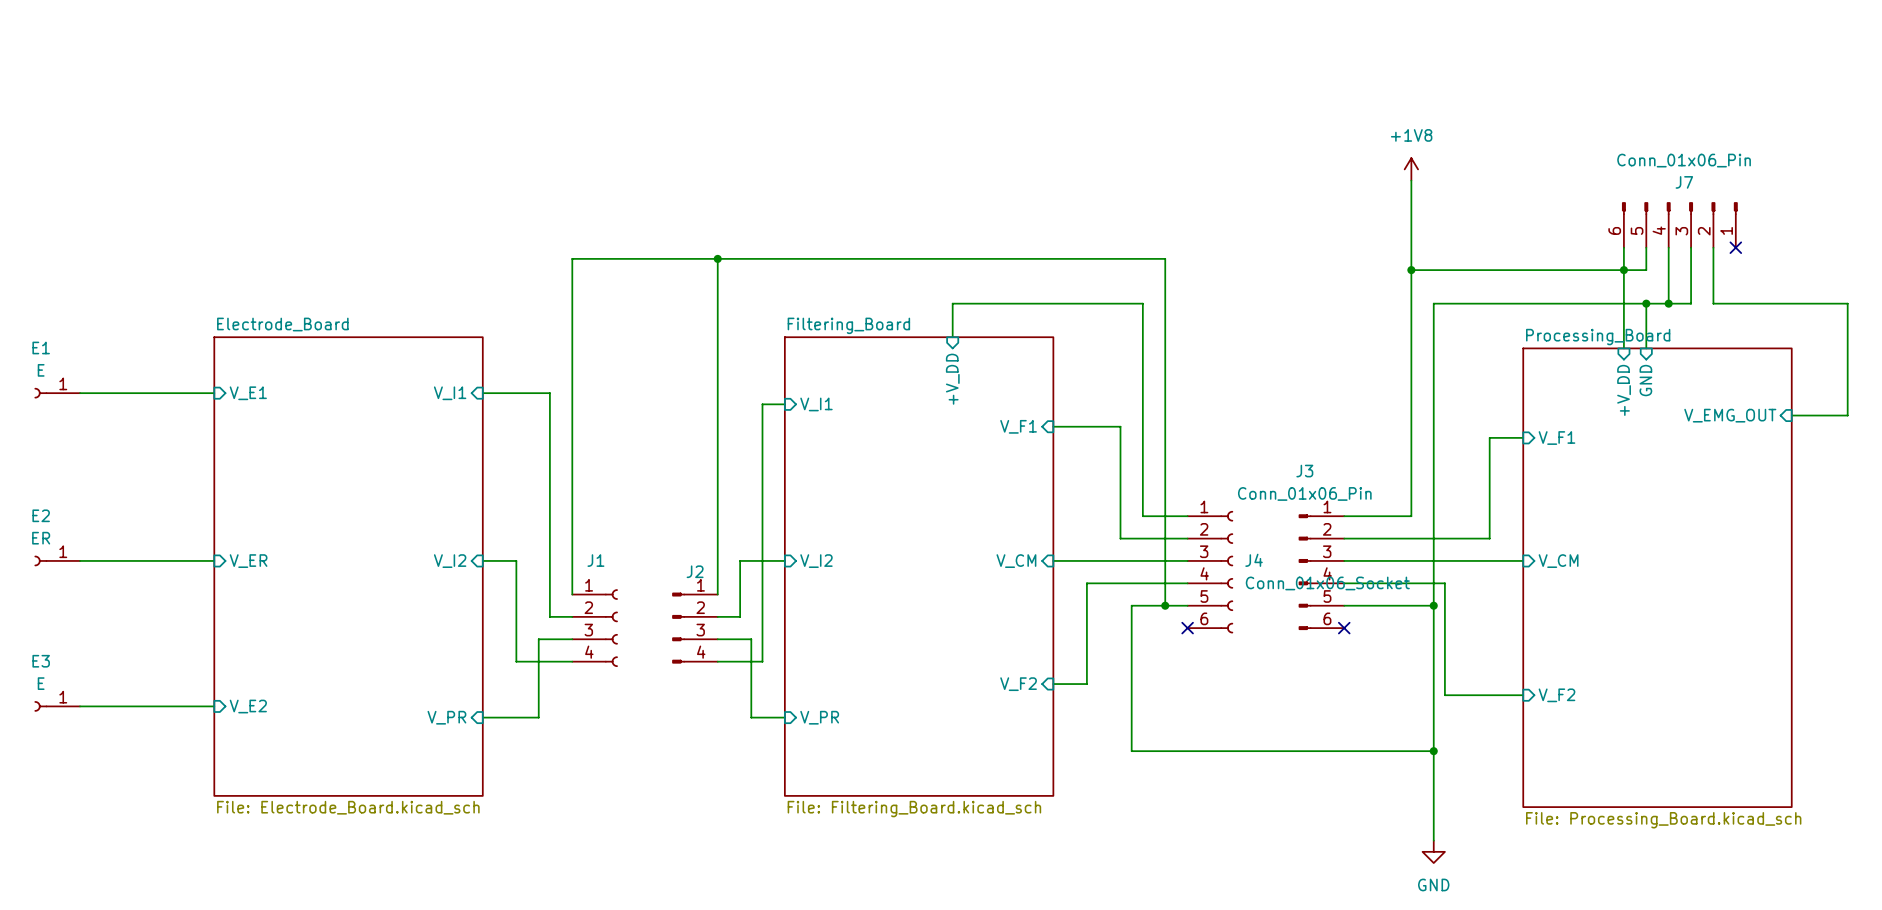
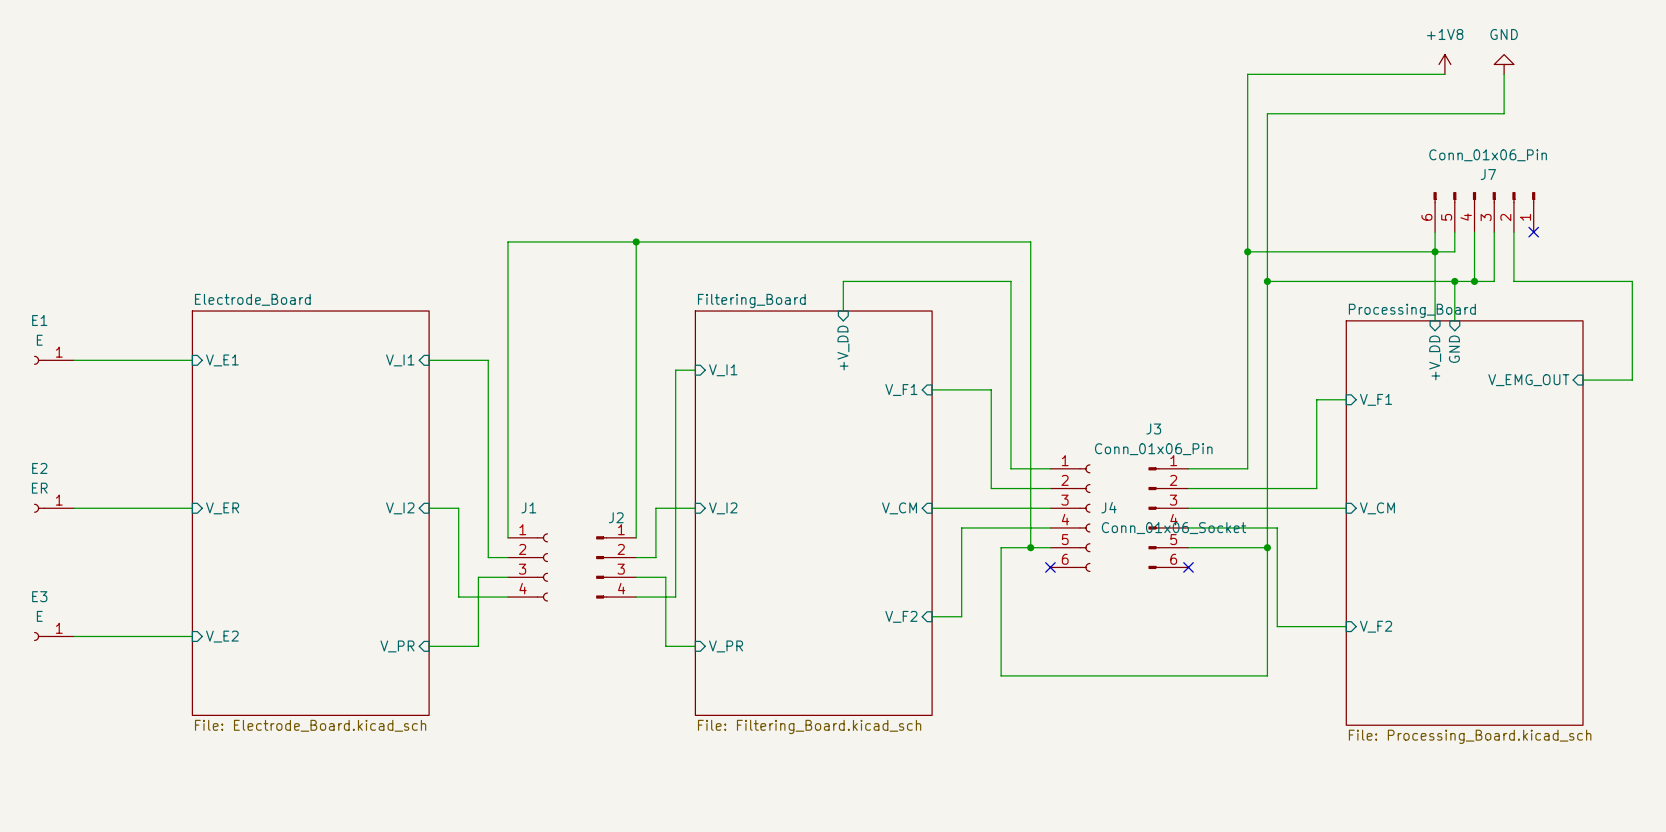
power symbol: none -> +1V8 (1444, 64)
power symbol: none -> GND (1504, 64)
wire: none -> (1444, 74) (1247, 74) (1247, 172)
wire: none -> (1504, 74) (1504, 113) (1267, 113) (1267, 281)
power symbol: +1V8 (1411, 169) -> none
junction: none -> (1267, 281)
wire: (1433, 751) (1433, 840) -> none
junction: (1433, 751) -> none
power symbol: GND (1433, 851) -> none

